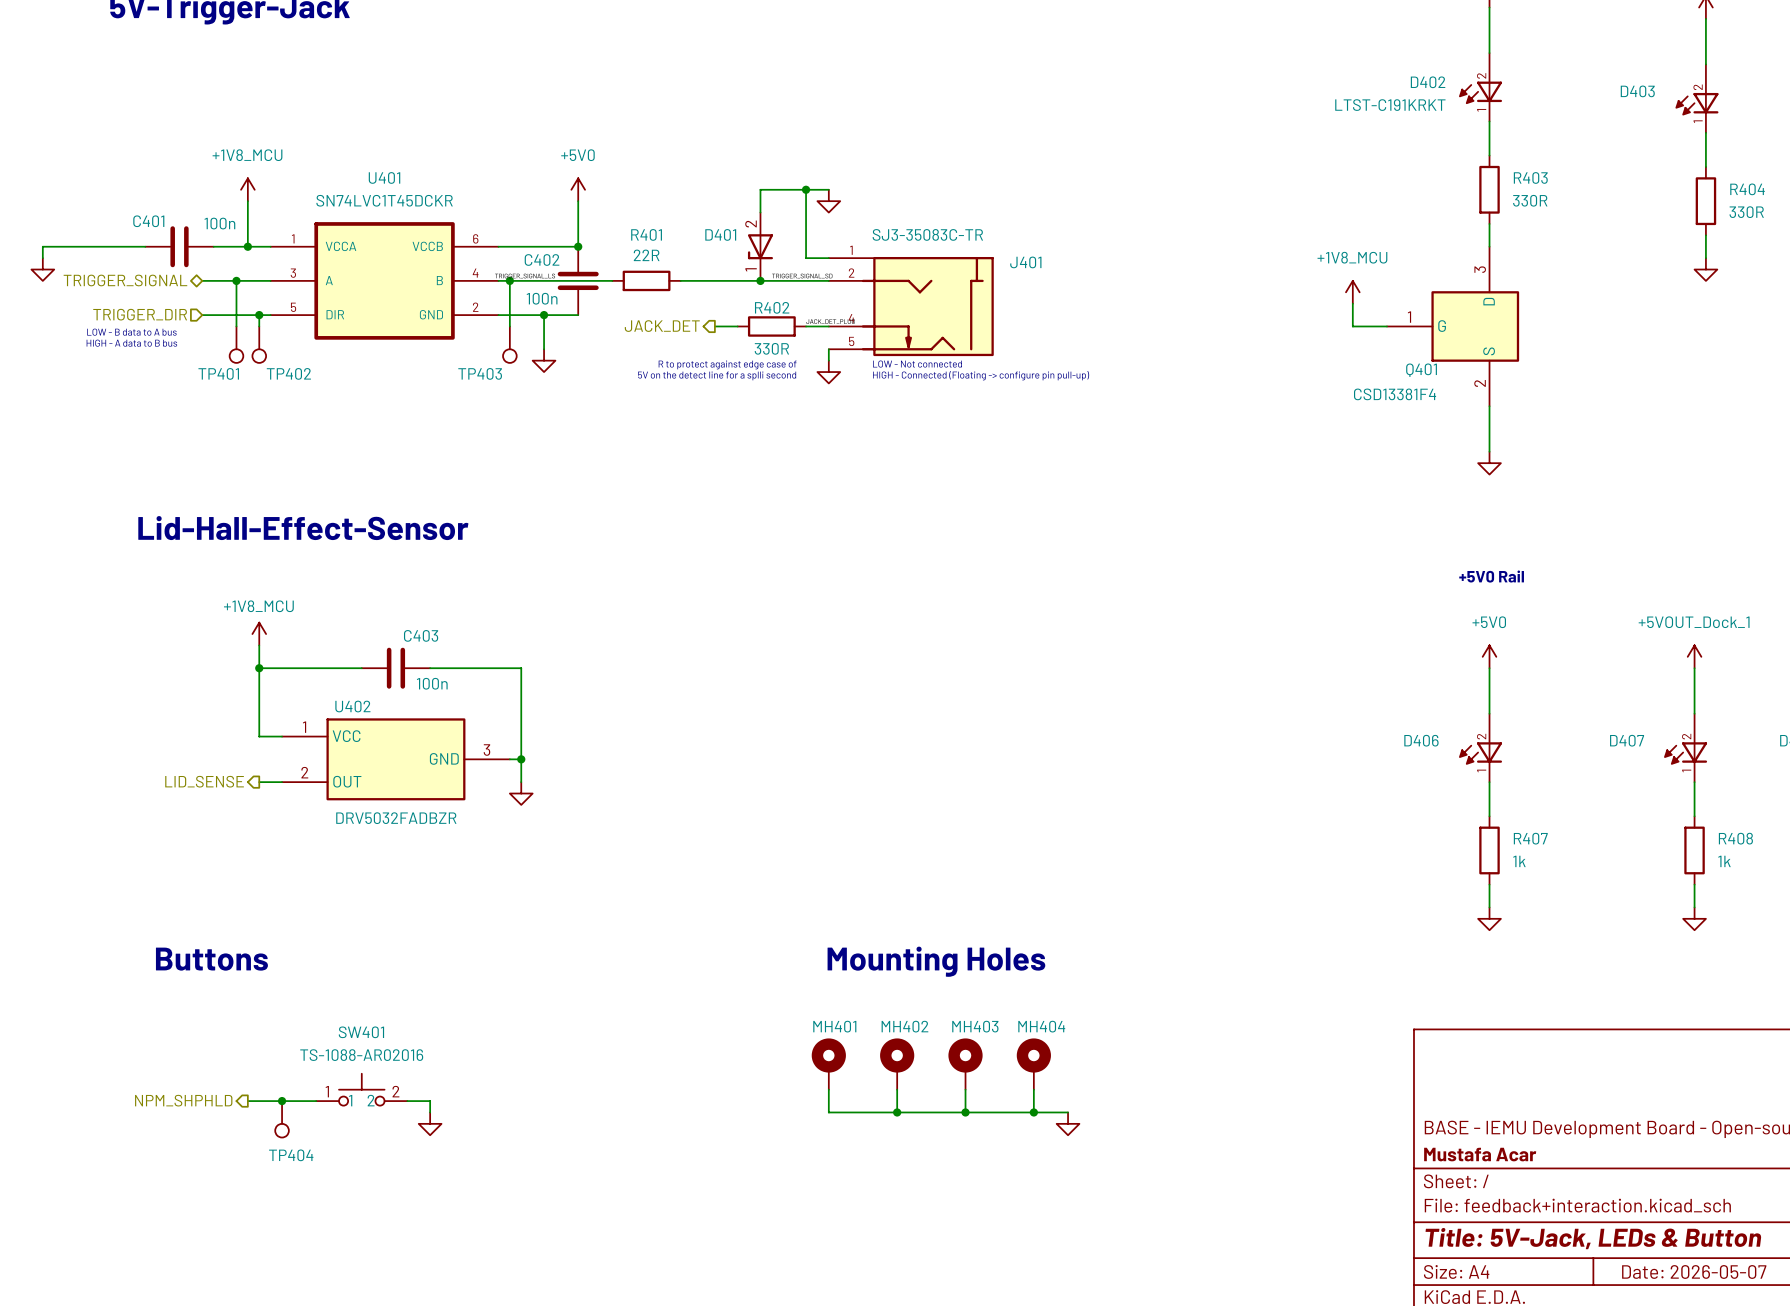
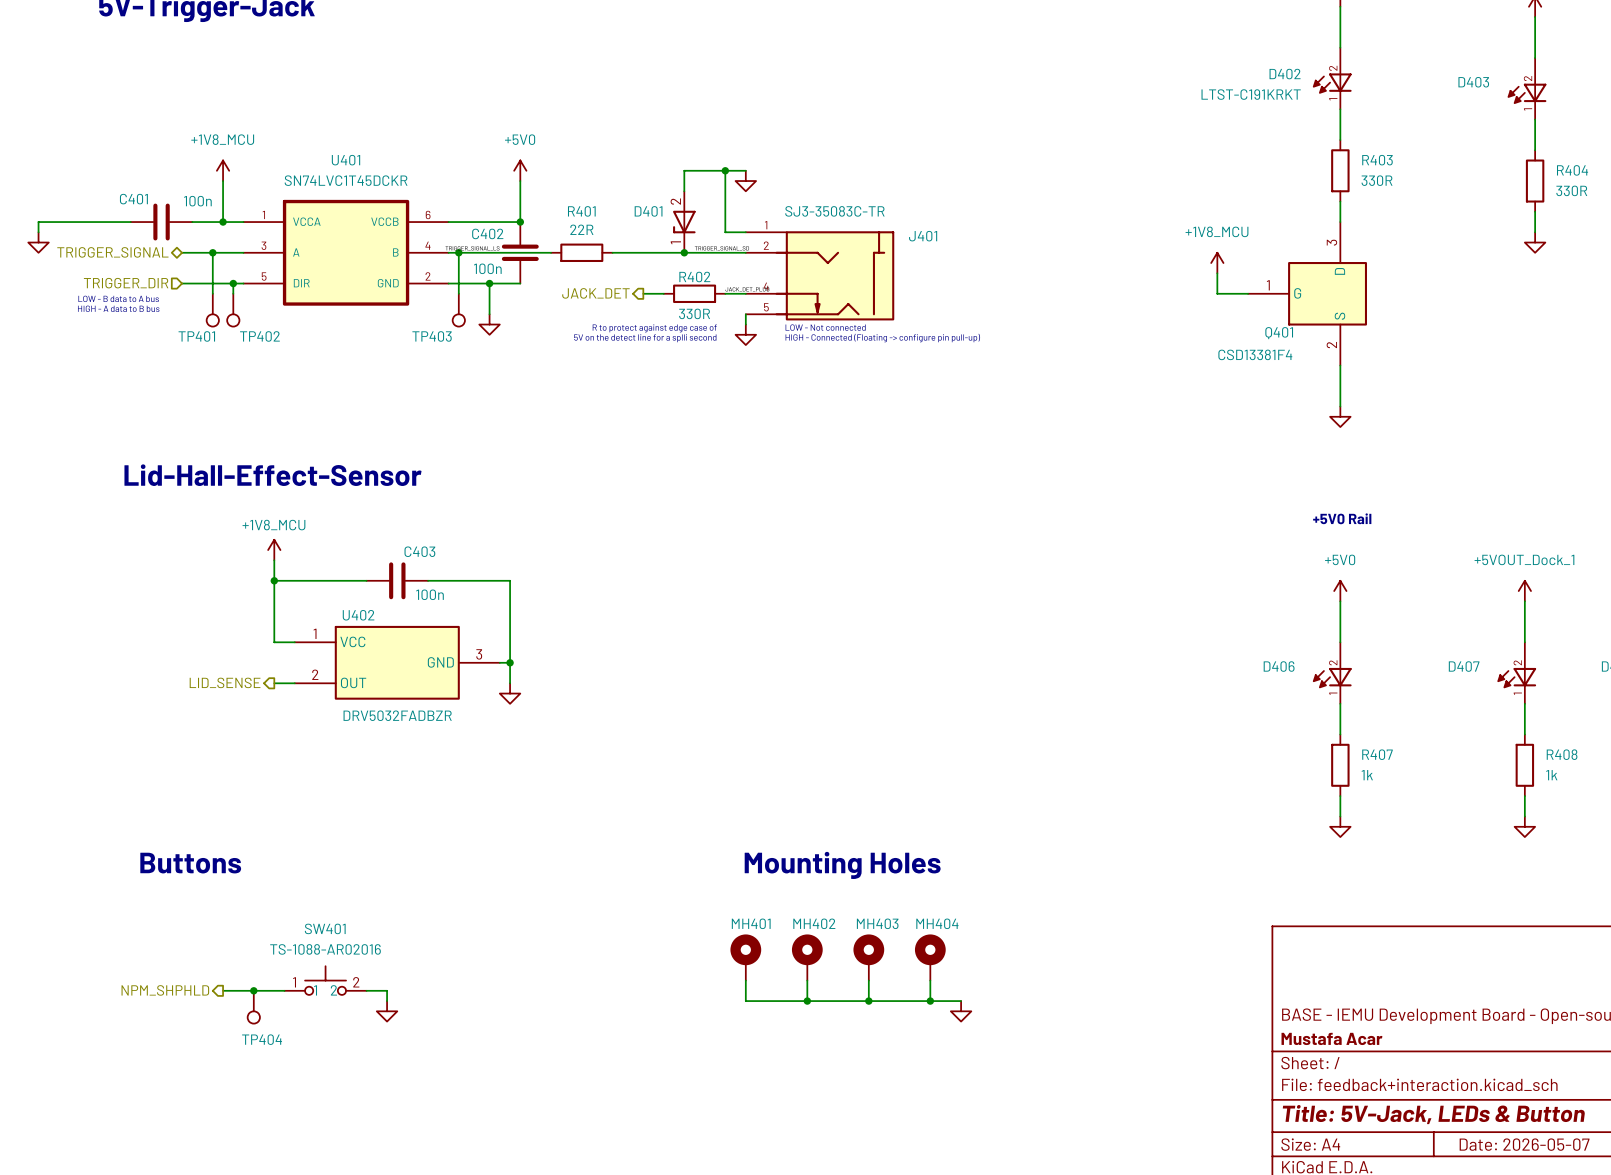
power symbol position: +1V8_MCU (259, 634) -> +1V8_MCU (274, 550)
wire: (259, 645) (259, 736) (282, 736) -> (274, 560) (274, 642) (294, 642)
wire: (259, 668) (361, 668) -> (274, 580) (366, 580)
junction position: (259, 668) -> (274, 580)
C403 position: (395, 668) -> (397, 580)
wire: (430, 668) (521, 668) (521, 782) -> (428, 580) (510, 580) (510, 683)
U402 position: (395, 759) -> (397, 662)
wire: (509, 759) (521, 759) -> (499, 662) (510, 662)
junction position: (521, 759) -> (510, 662)
hierarchical label position: LID_SENSE (204, 781) -> LID_SENSE (225, 682)
wire: (259, 782) (282, 782) -> (274, 683) (294, 683)
power symbol position: (521, 793) -> (510, 693)

